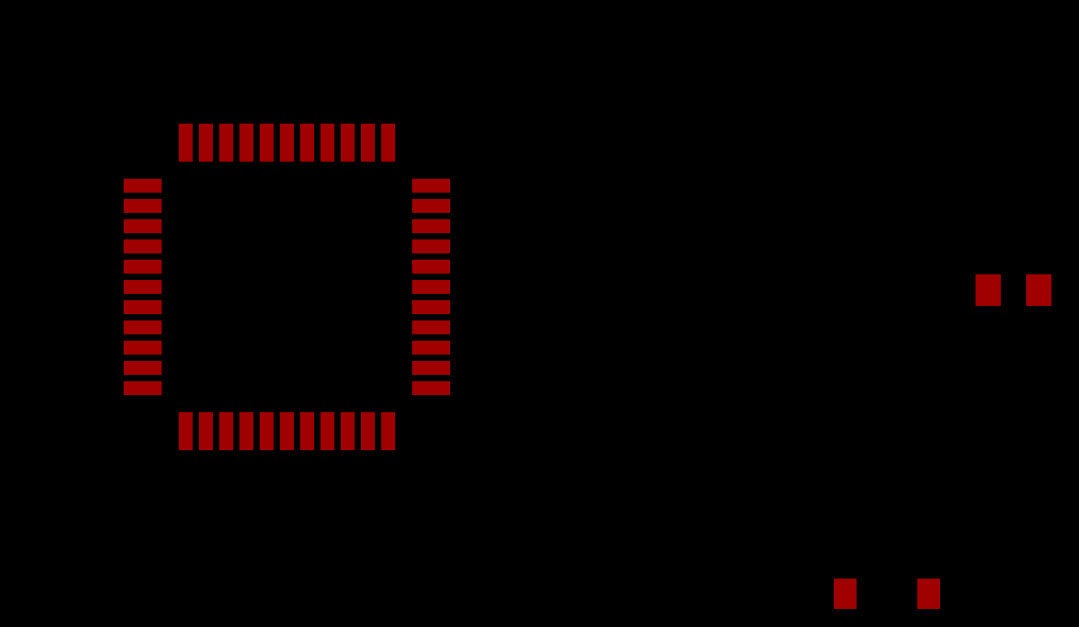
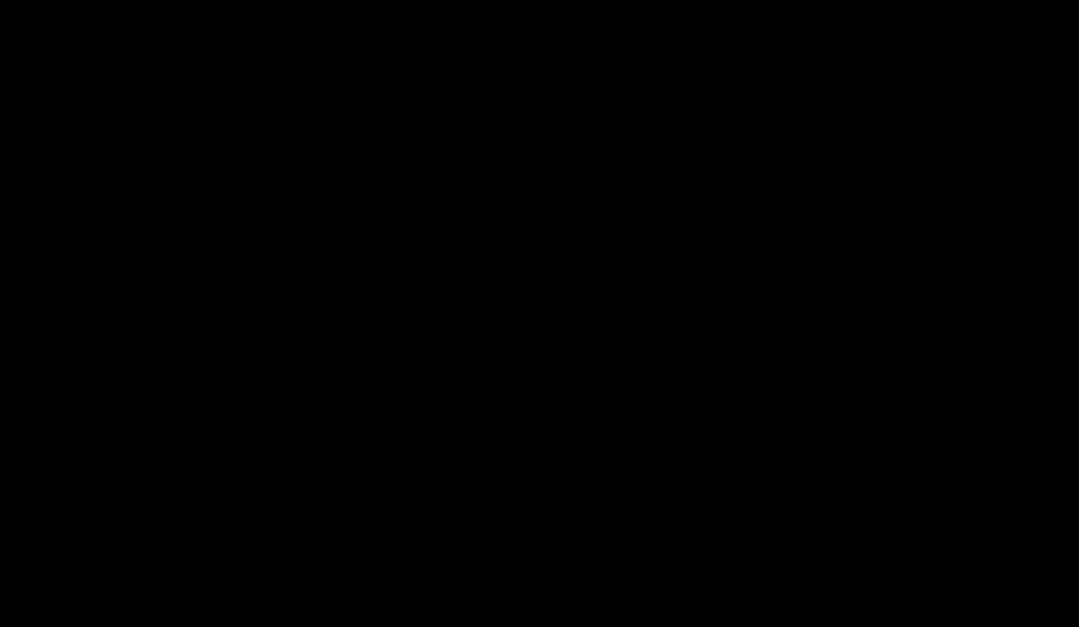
part: (286, 286) -> none
part: (1013, 290) -> none
part: (886, 593) -> none

